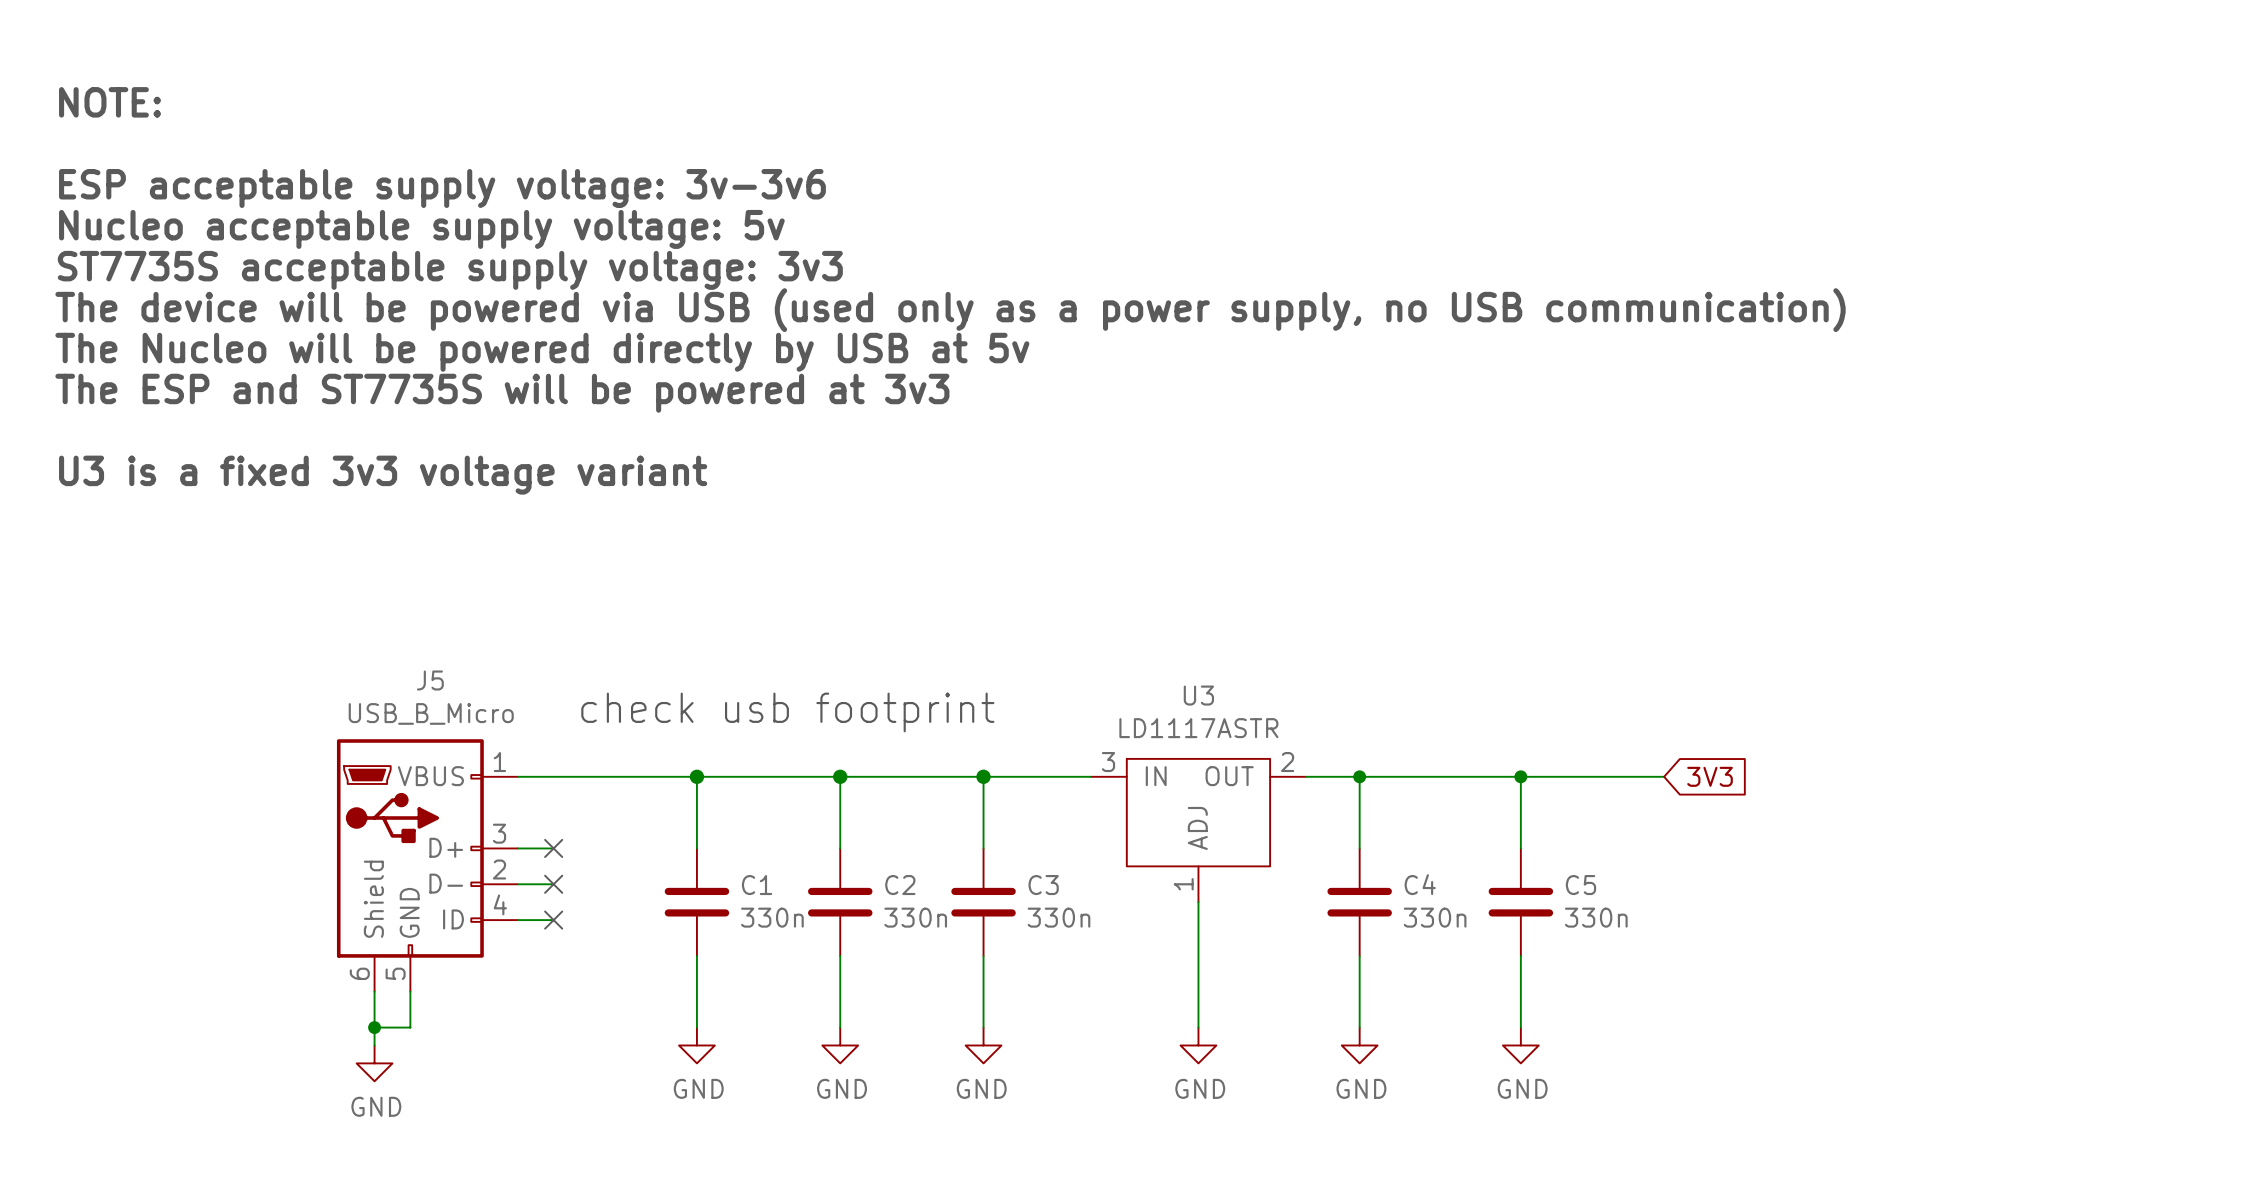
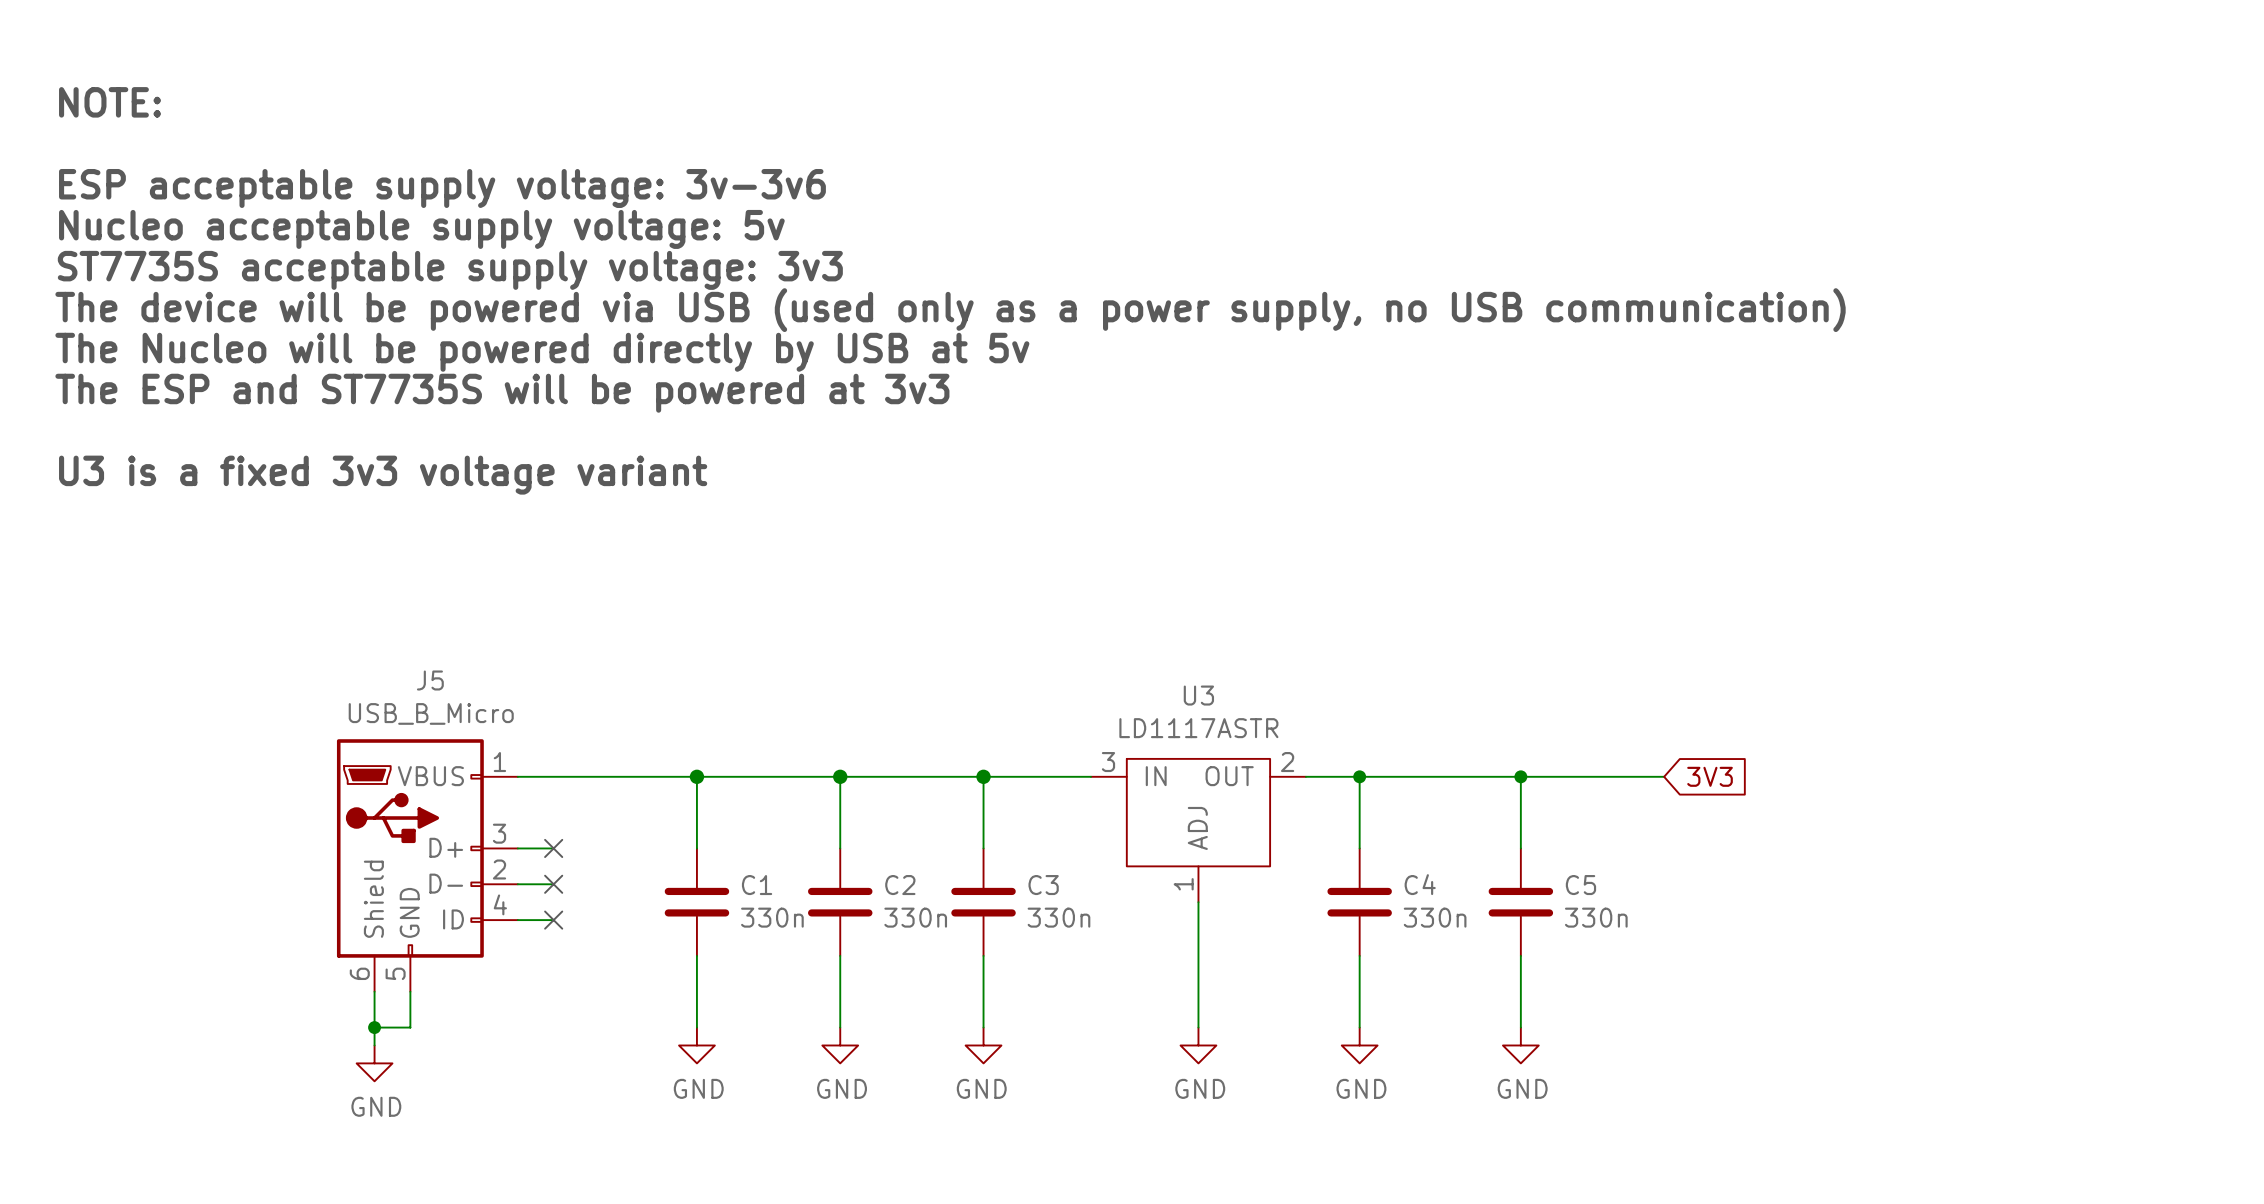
text: check usb footprint (787, 712) -> none

